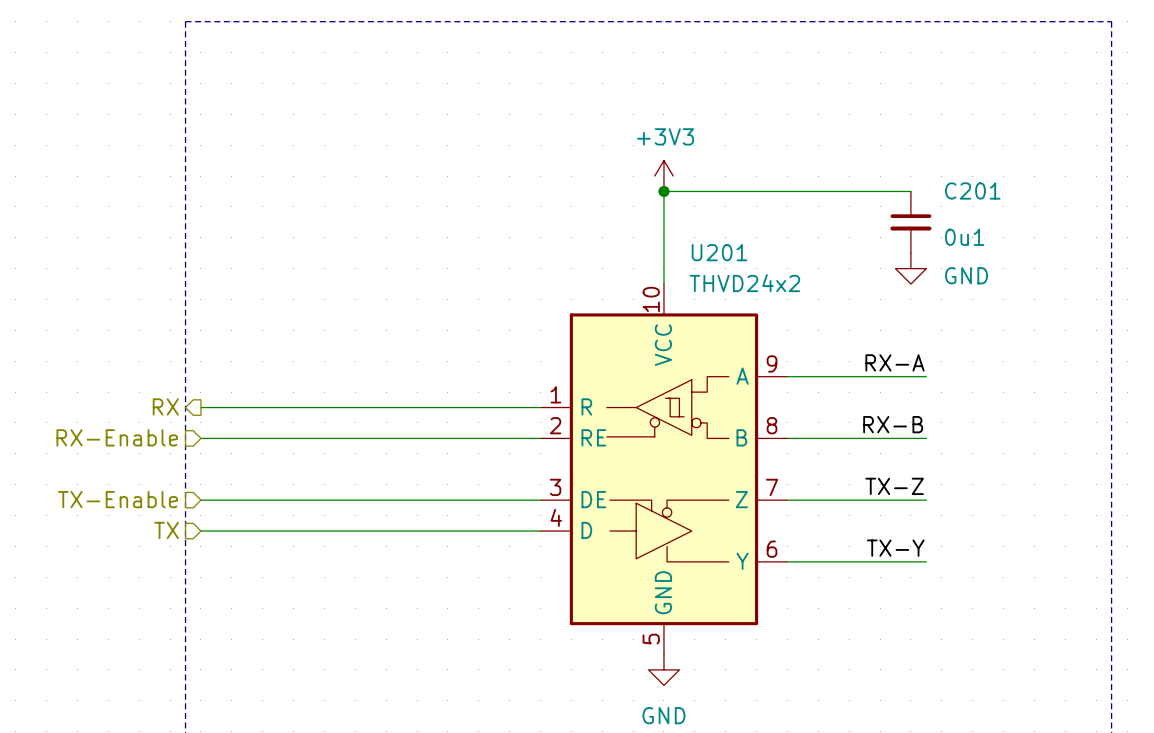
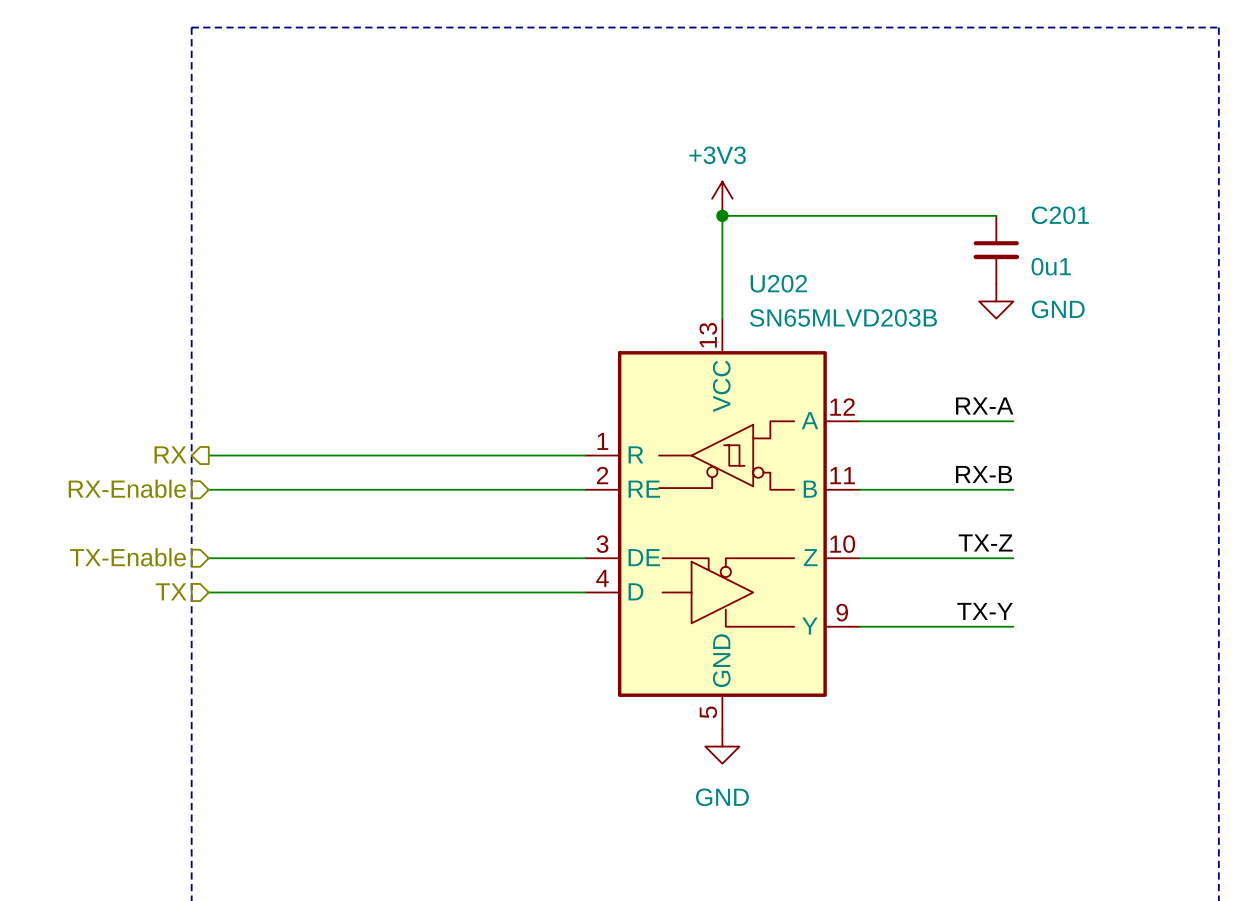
U201 name: U201 (719, 252) -> U202 (778, 283)
U201 value: THVD24x2 (744, 283) -> SN65MLVD203B (843, 317)
U201 pin number: 10 (651, 299) -> 13 (708, 335)
U201 pin number: 9 (772, 363) -> 12 (842, 407)
U201 pin number: 8 (772, 425) -> 11 (842, 475)
U201 pin number: 7 (772, 487) -> 10 (842, 544)
U201 pin number: 6 (772, 549) -> 9 (842, 612)

